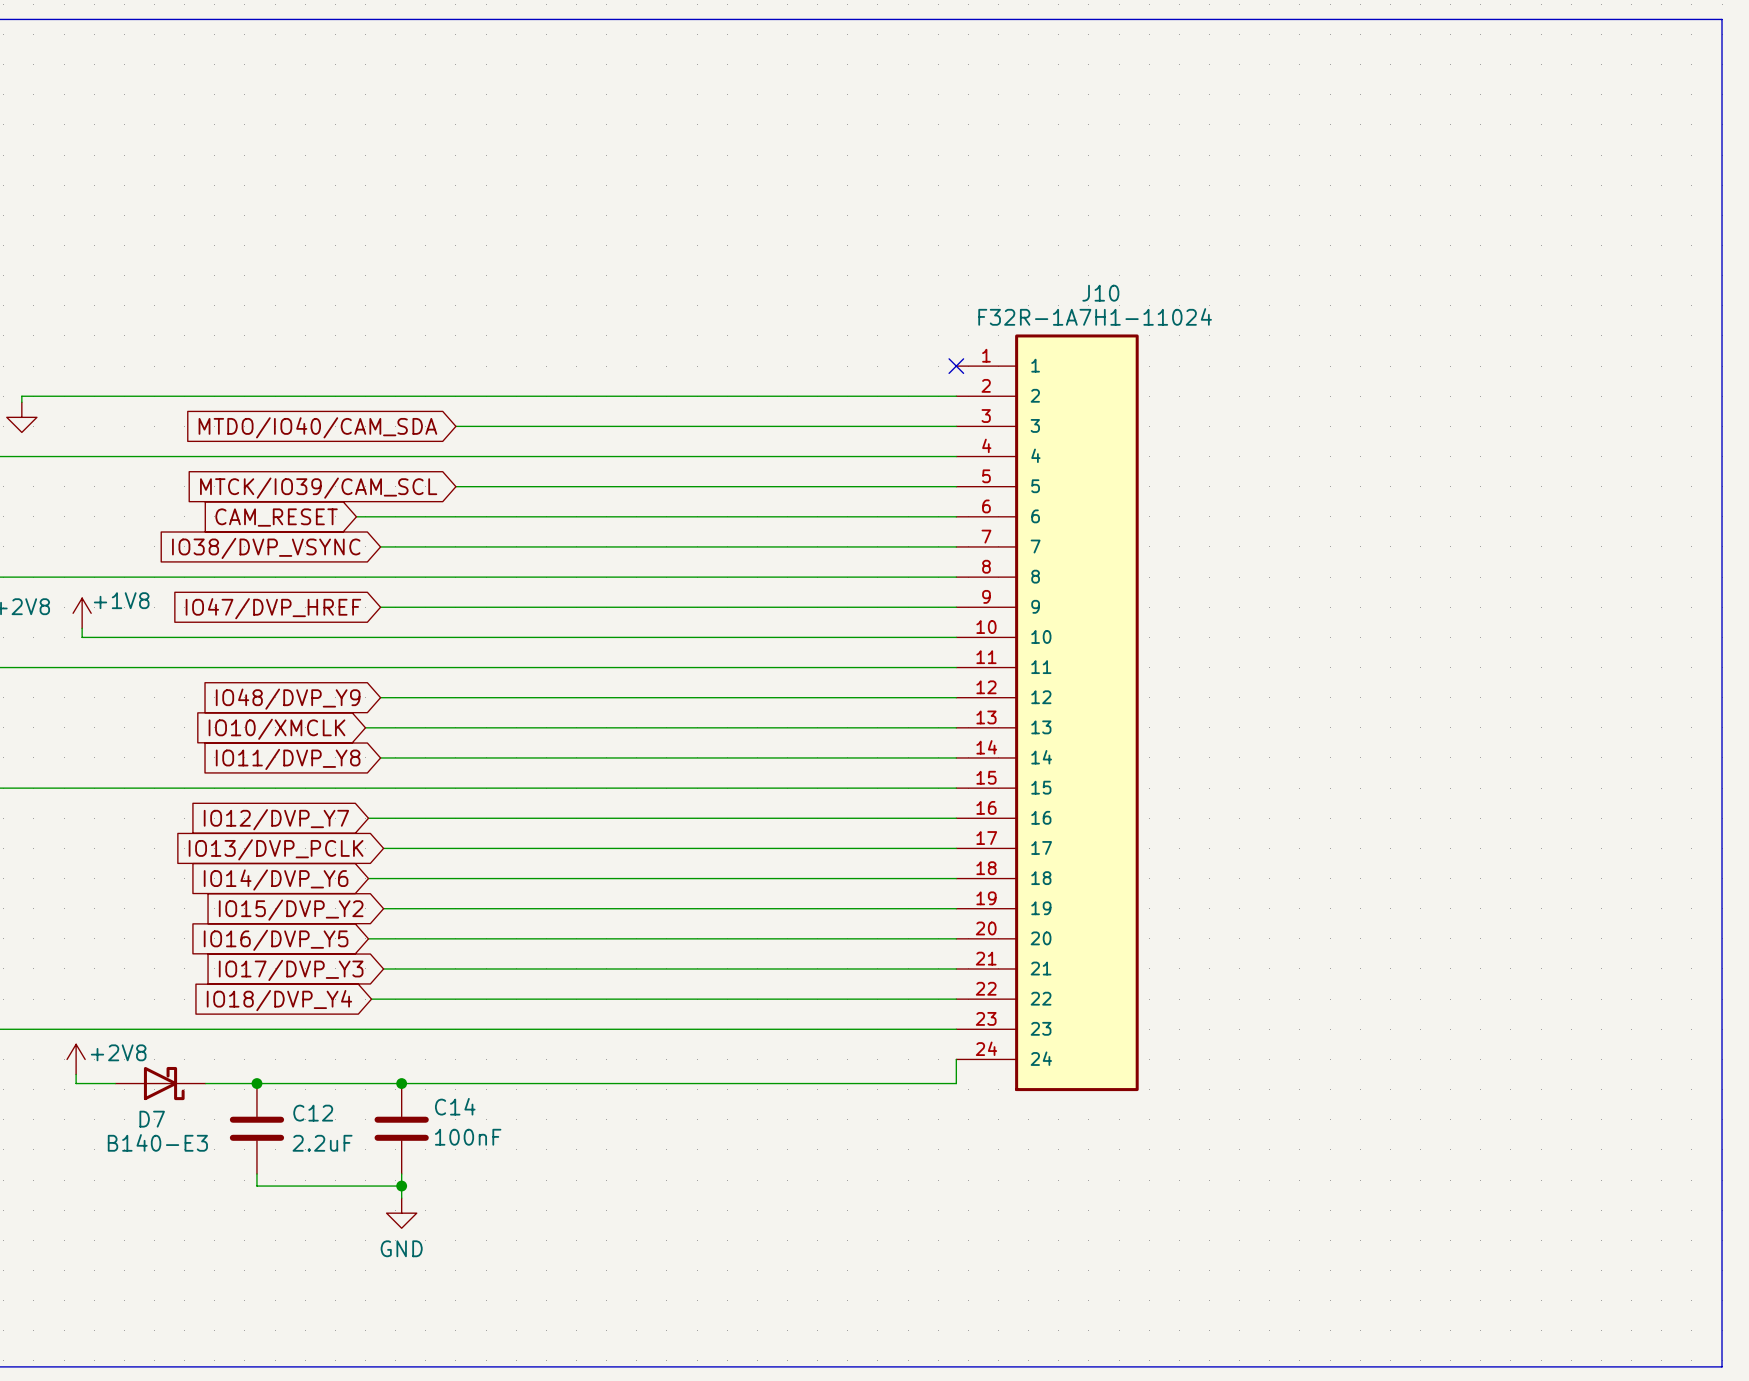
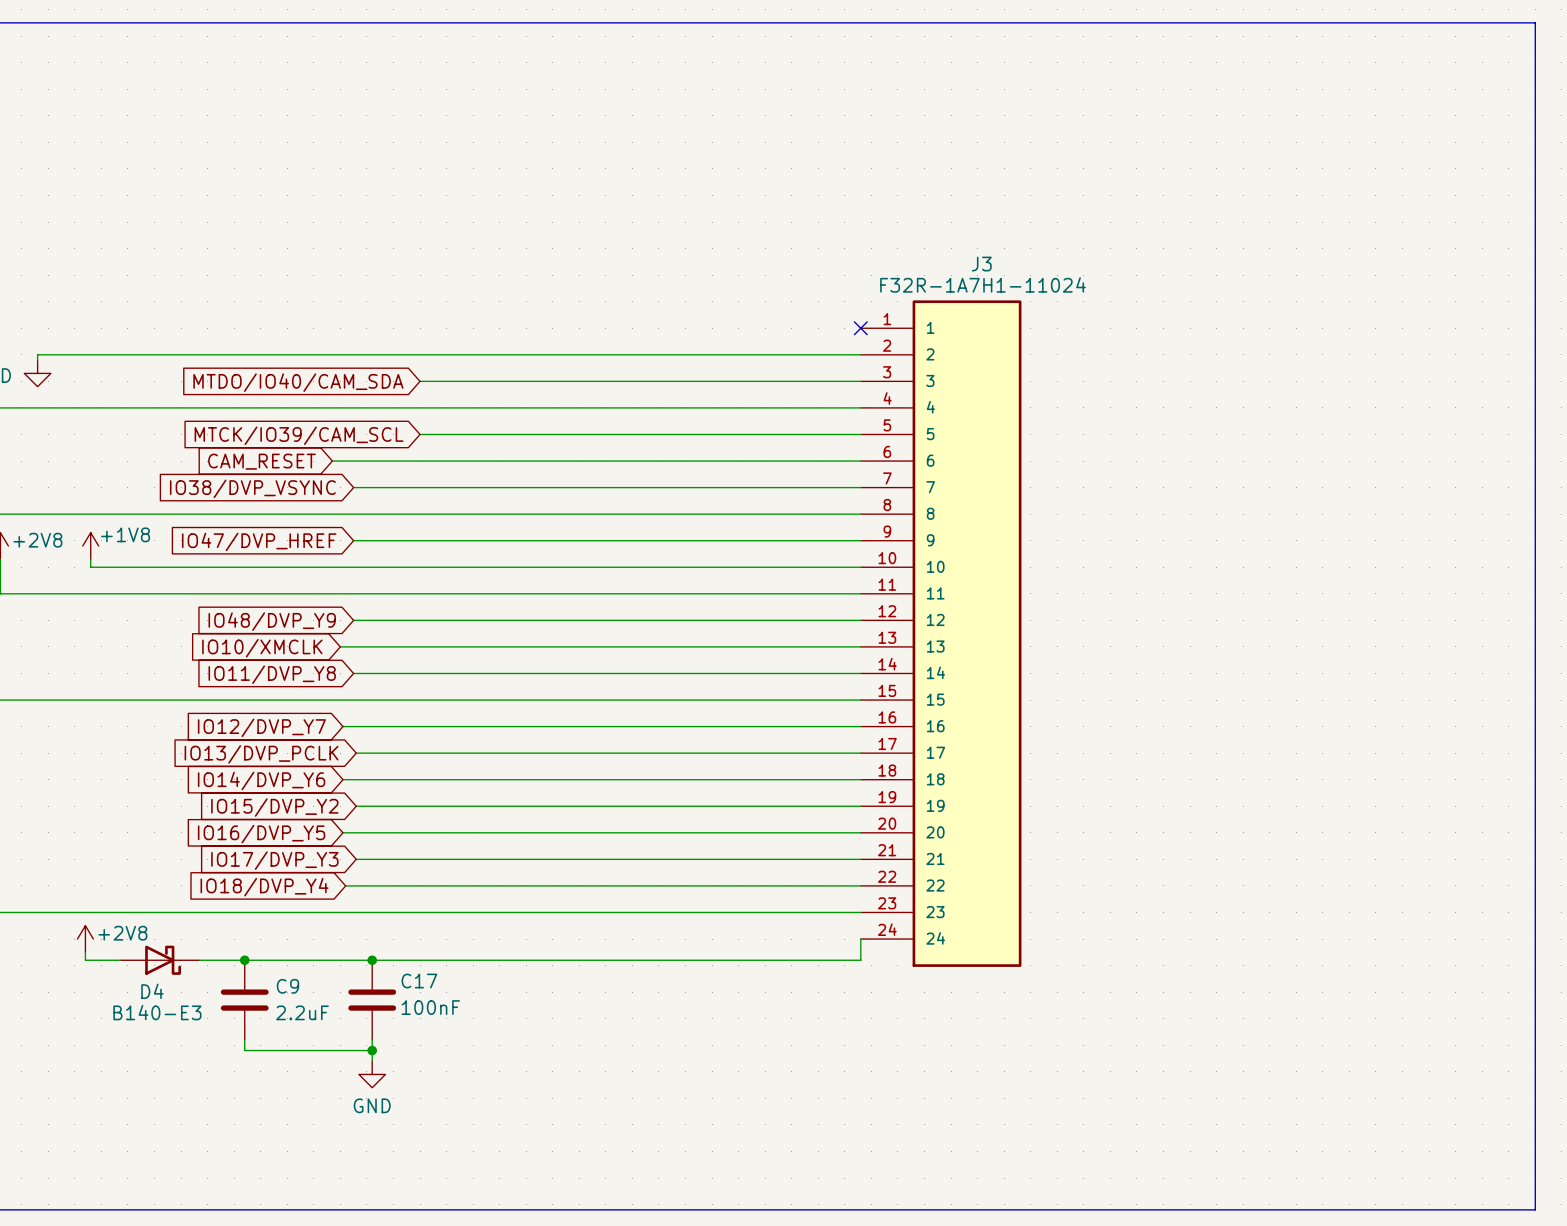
J10 name: J10 (1100, 293) -> J3 (981, 264)
C14 name: C14 (455, 1106) -> C17 (419, 981)
C12 name: C12 (313, 1113) -> C9 (287, 986)
D7 name: D7 (152, 1119) -> D4 (152, 991)

